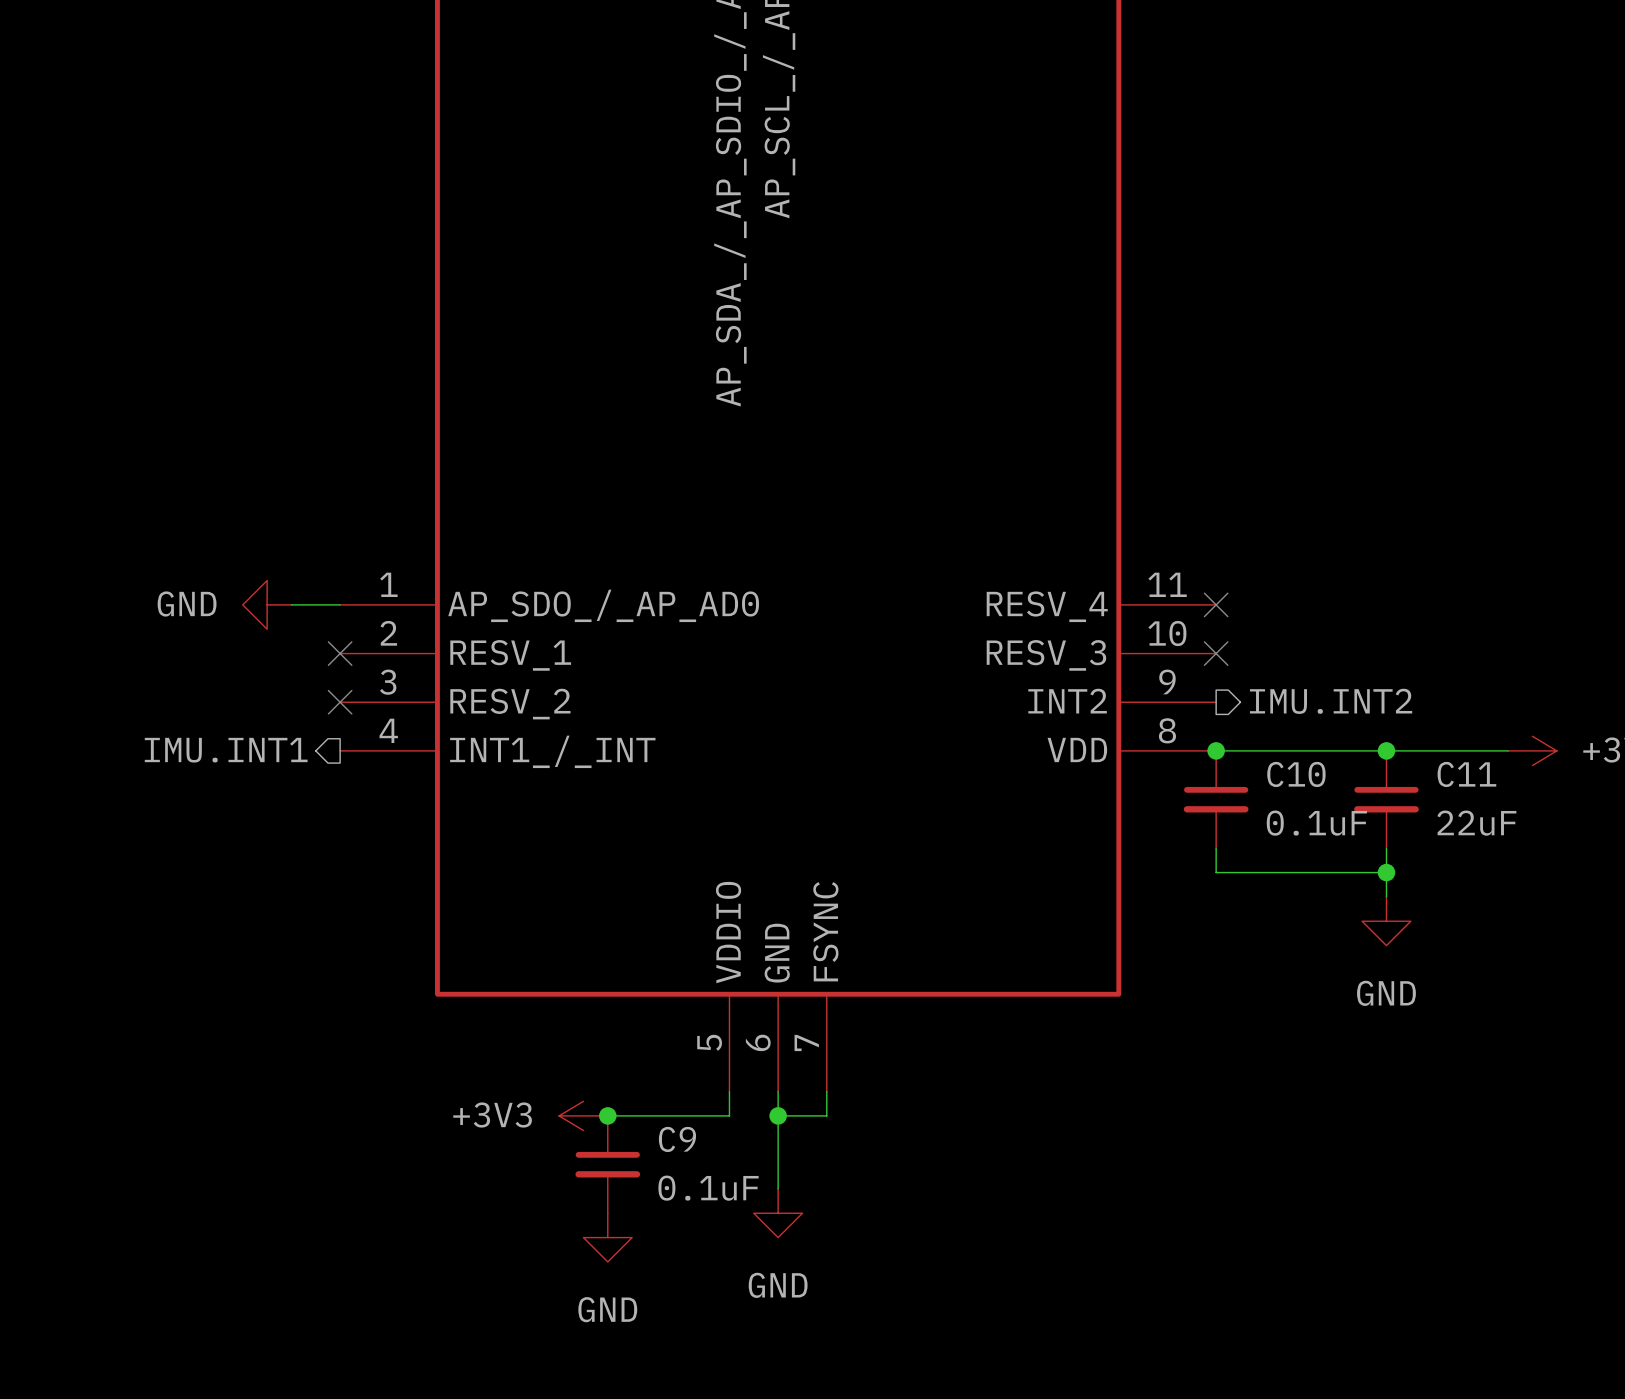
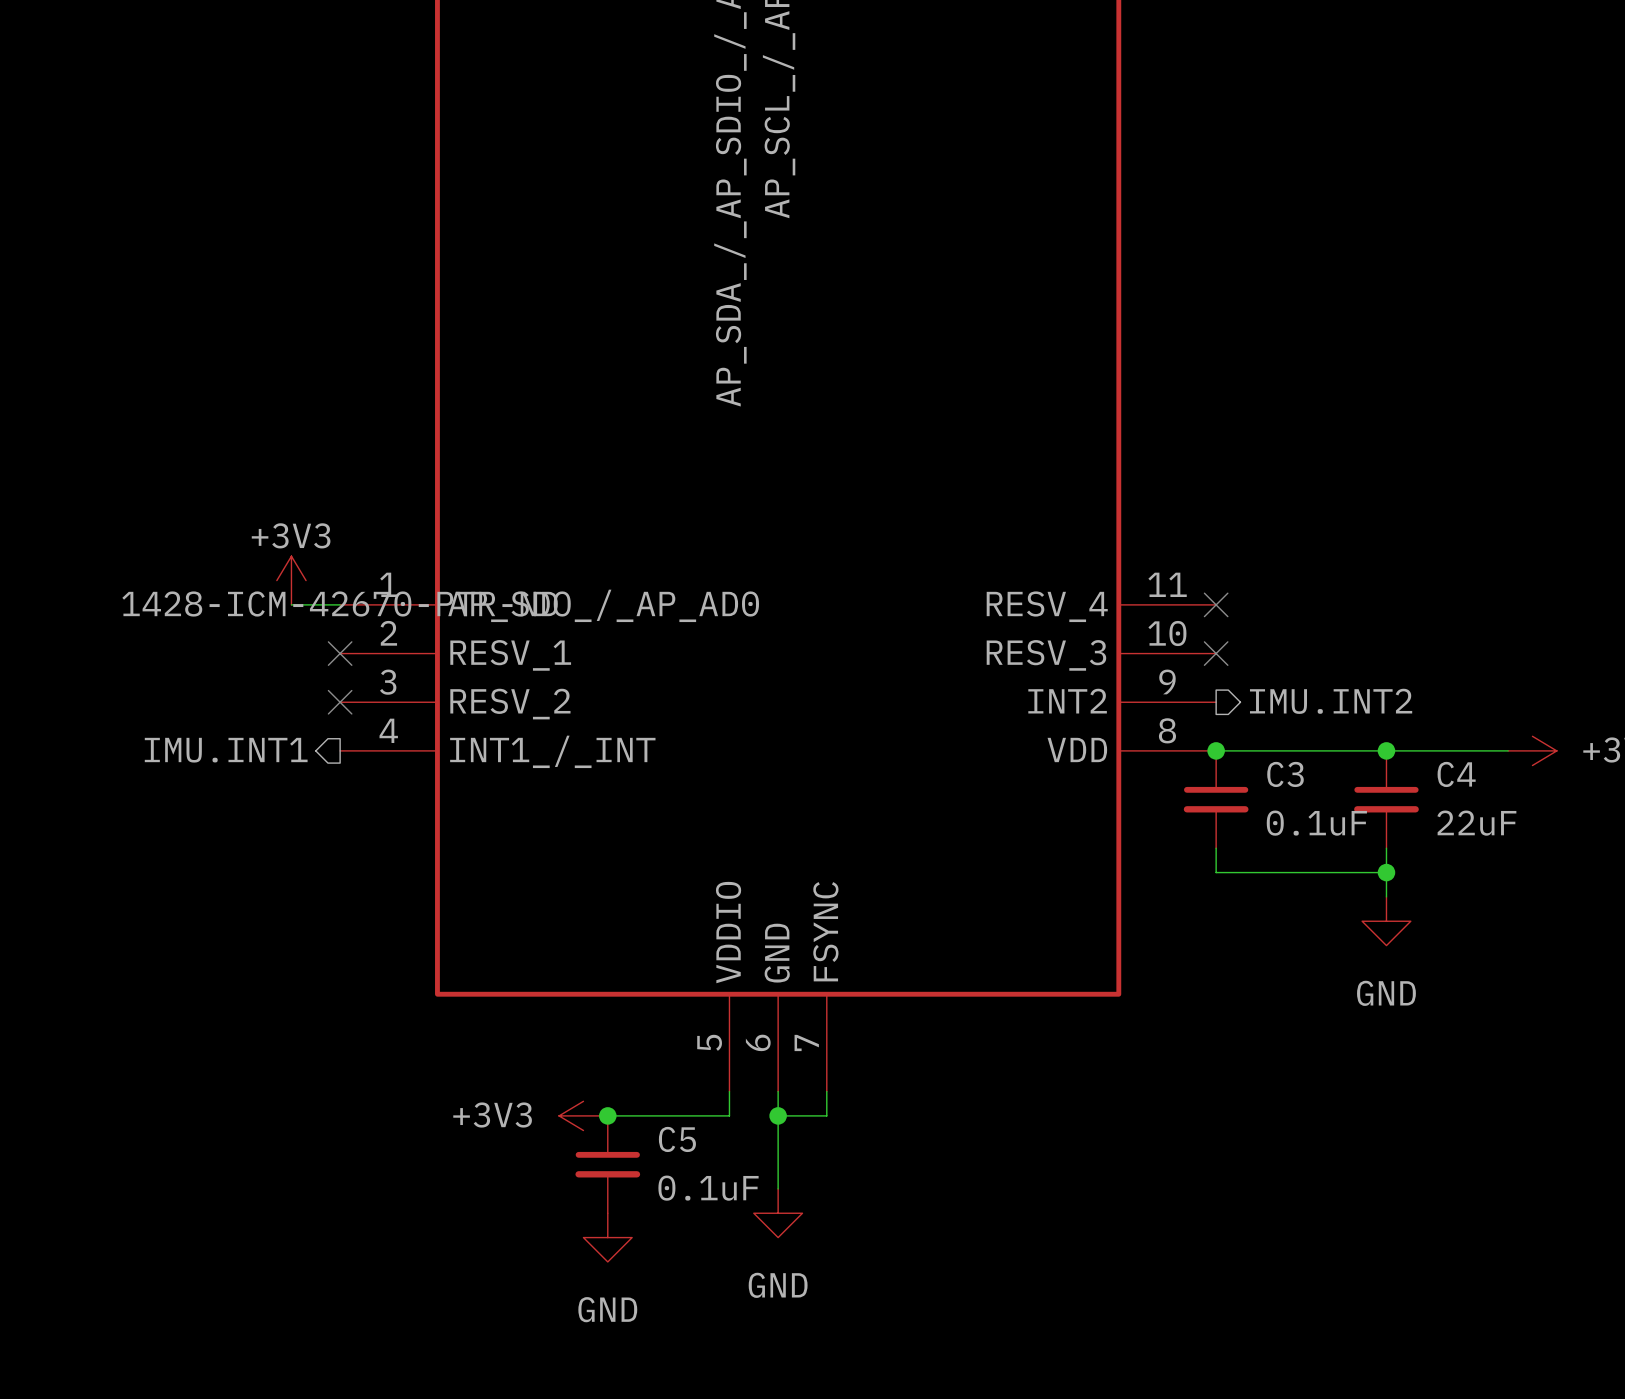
power symbol: none -> +3V3 (291, 580)
power symbol: GND (267, 604) -> none
part text: none -> 1428-ICM-42670-PTR-ND (340, 604)
C10 name: C10 (1296, 774) -> C3 (1285, 774)
C11 name: C11 (1466, 774) -> C4 (1456, 774)
C9 name: C9 (677, 1139) -> C5 (677, 1139)

